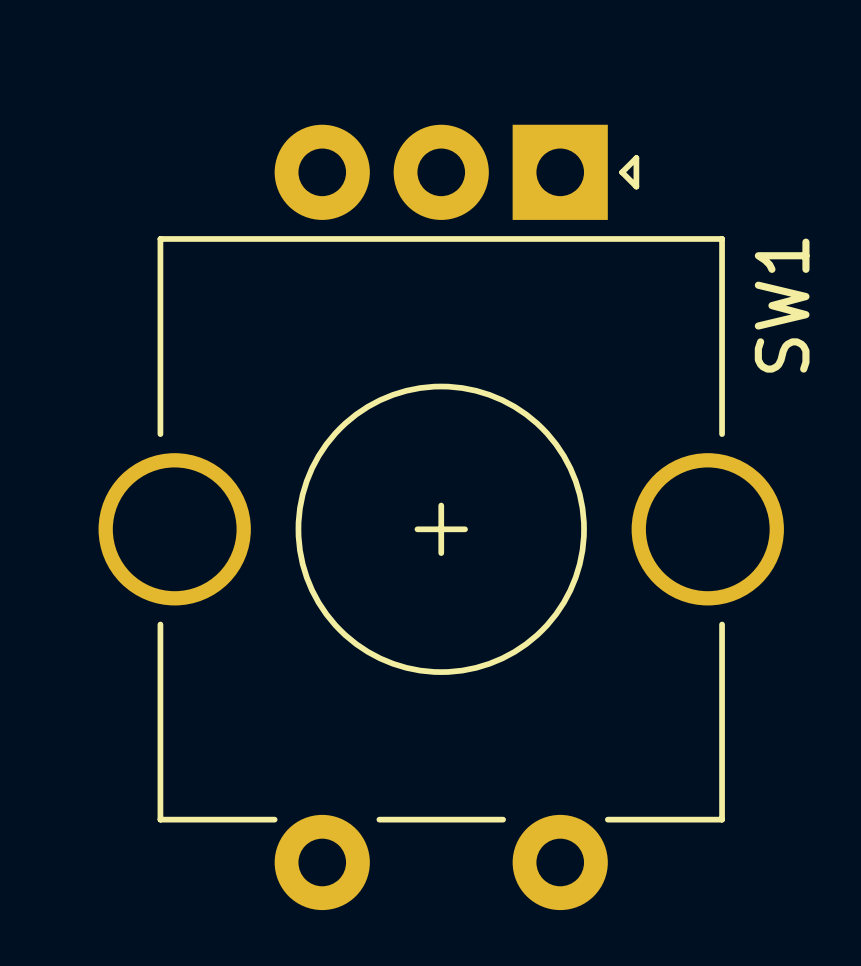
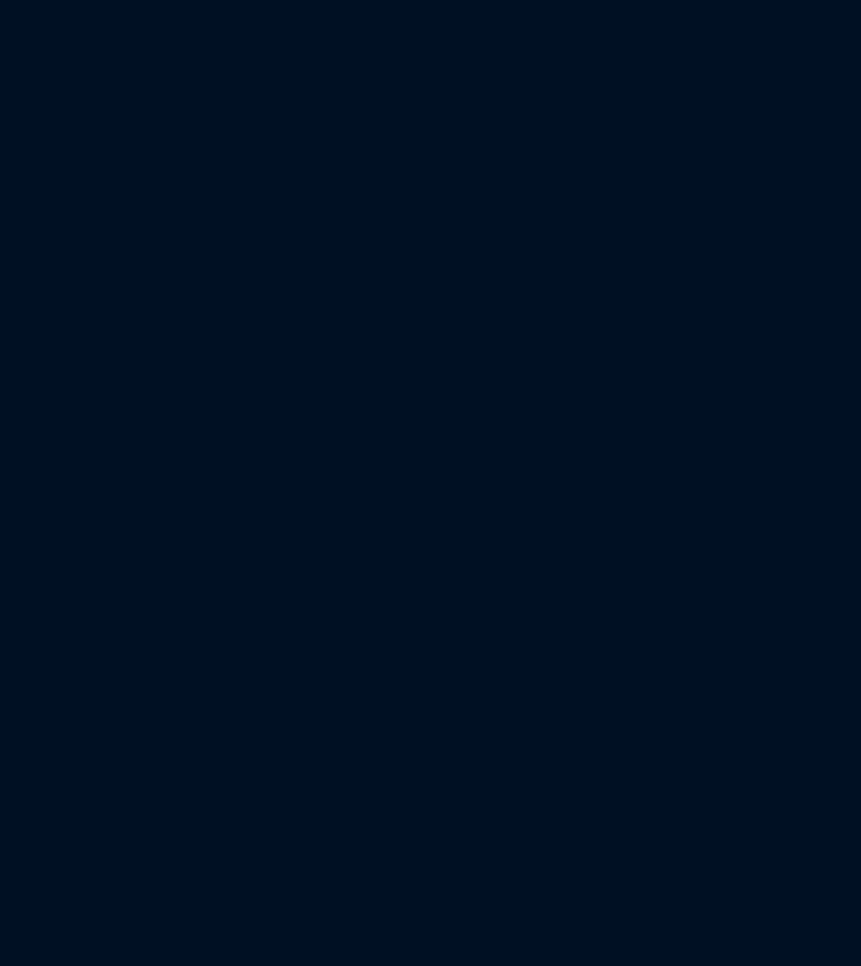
SW1: (441, 517) -> none

